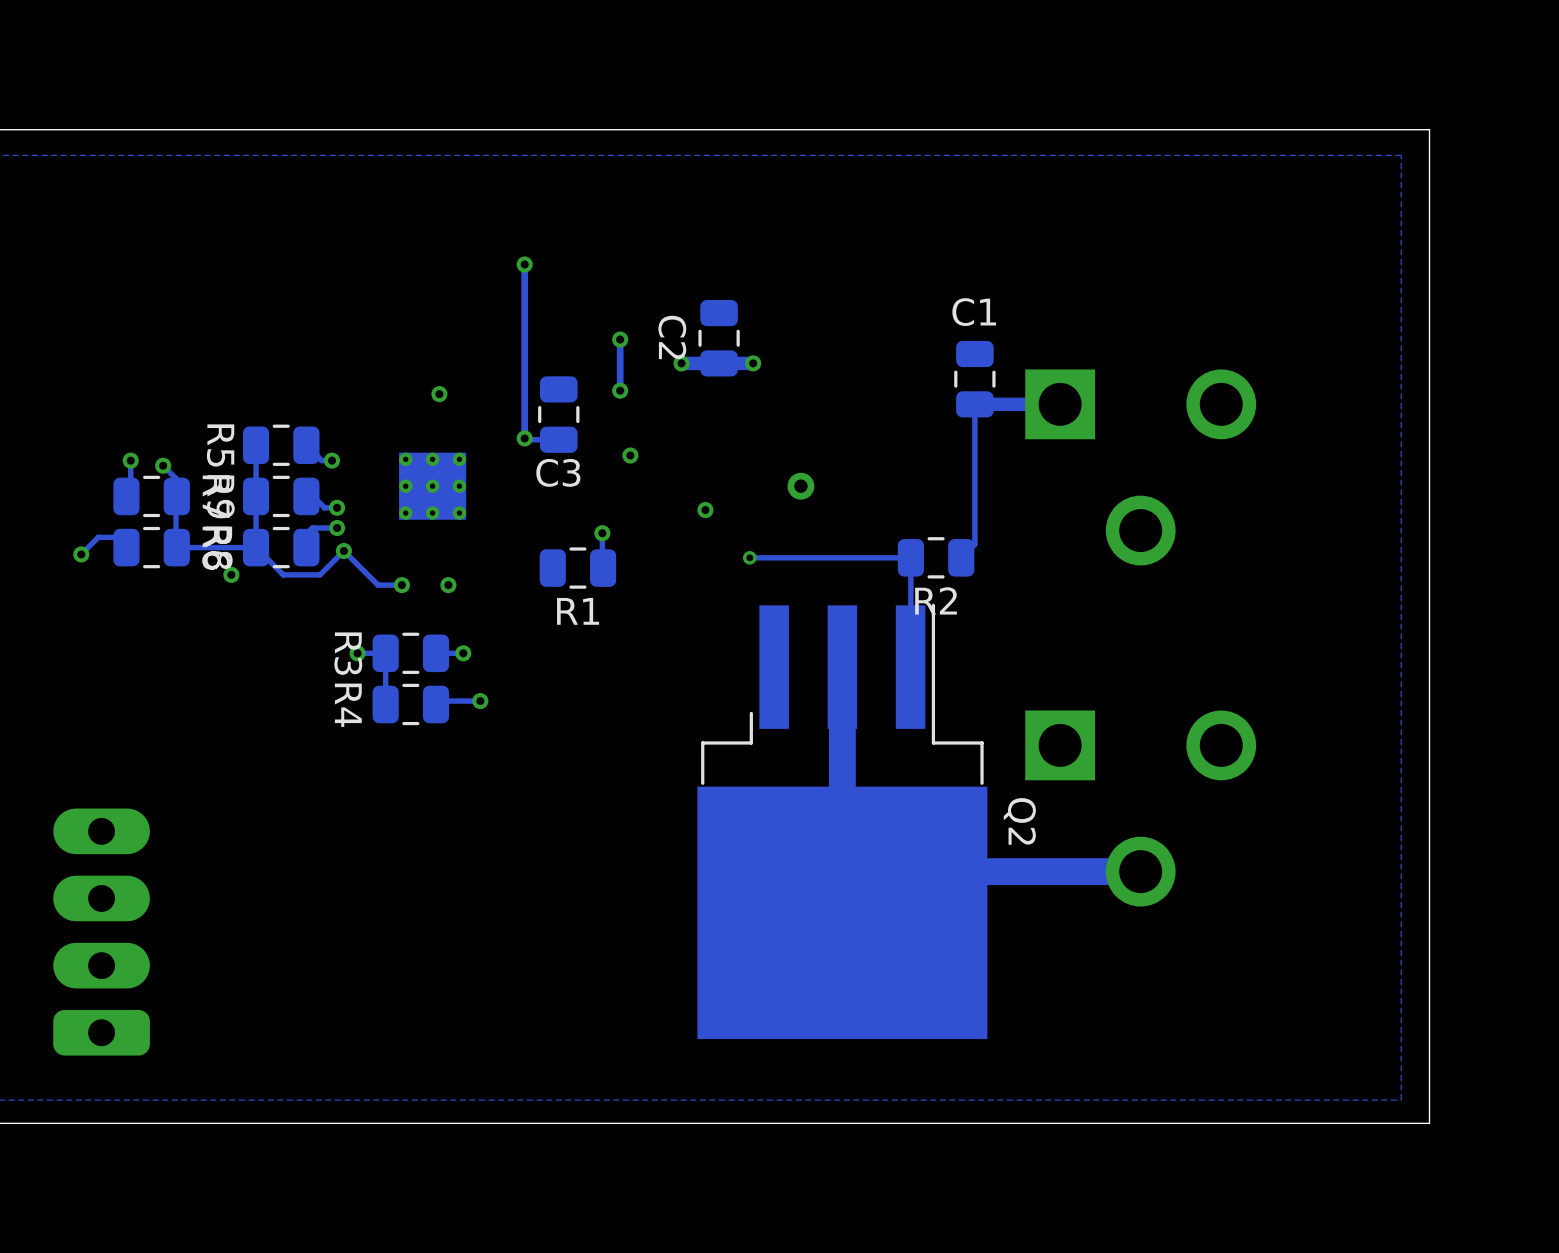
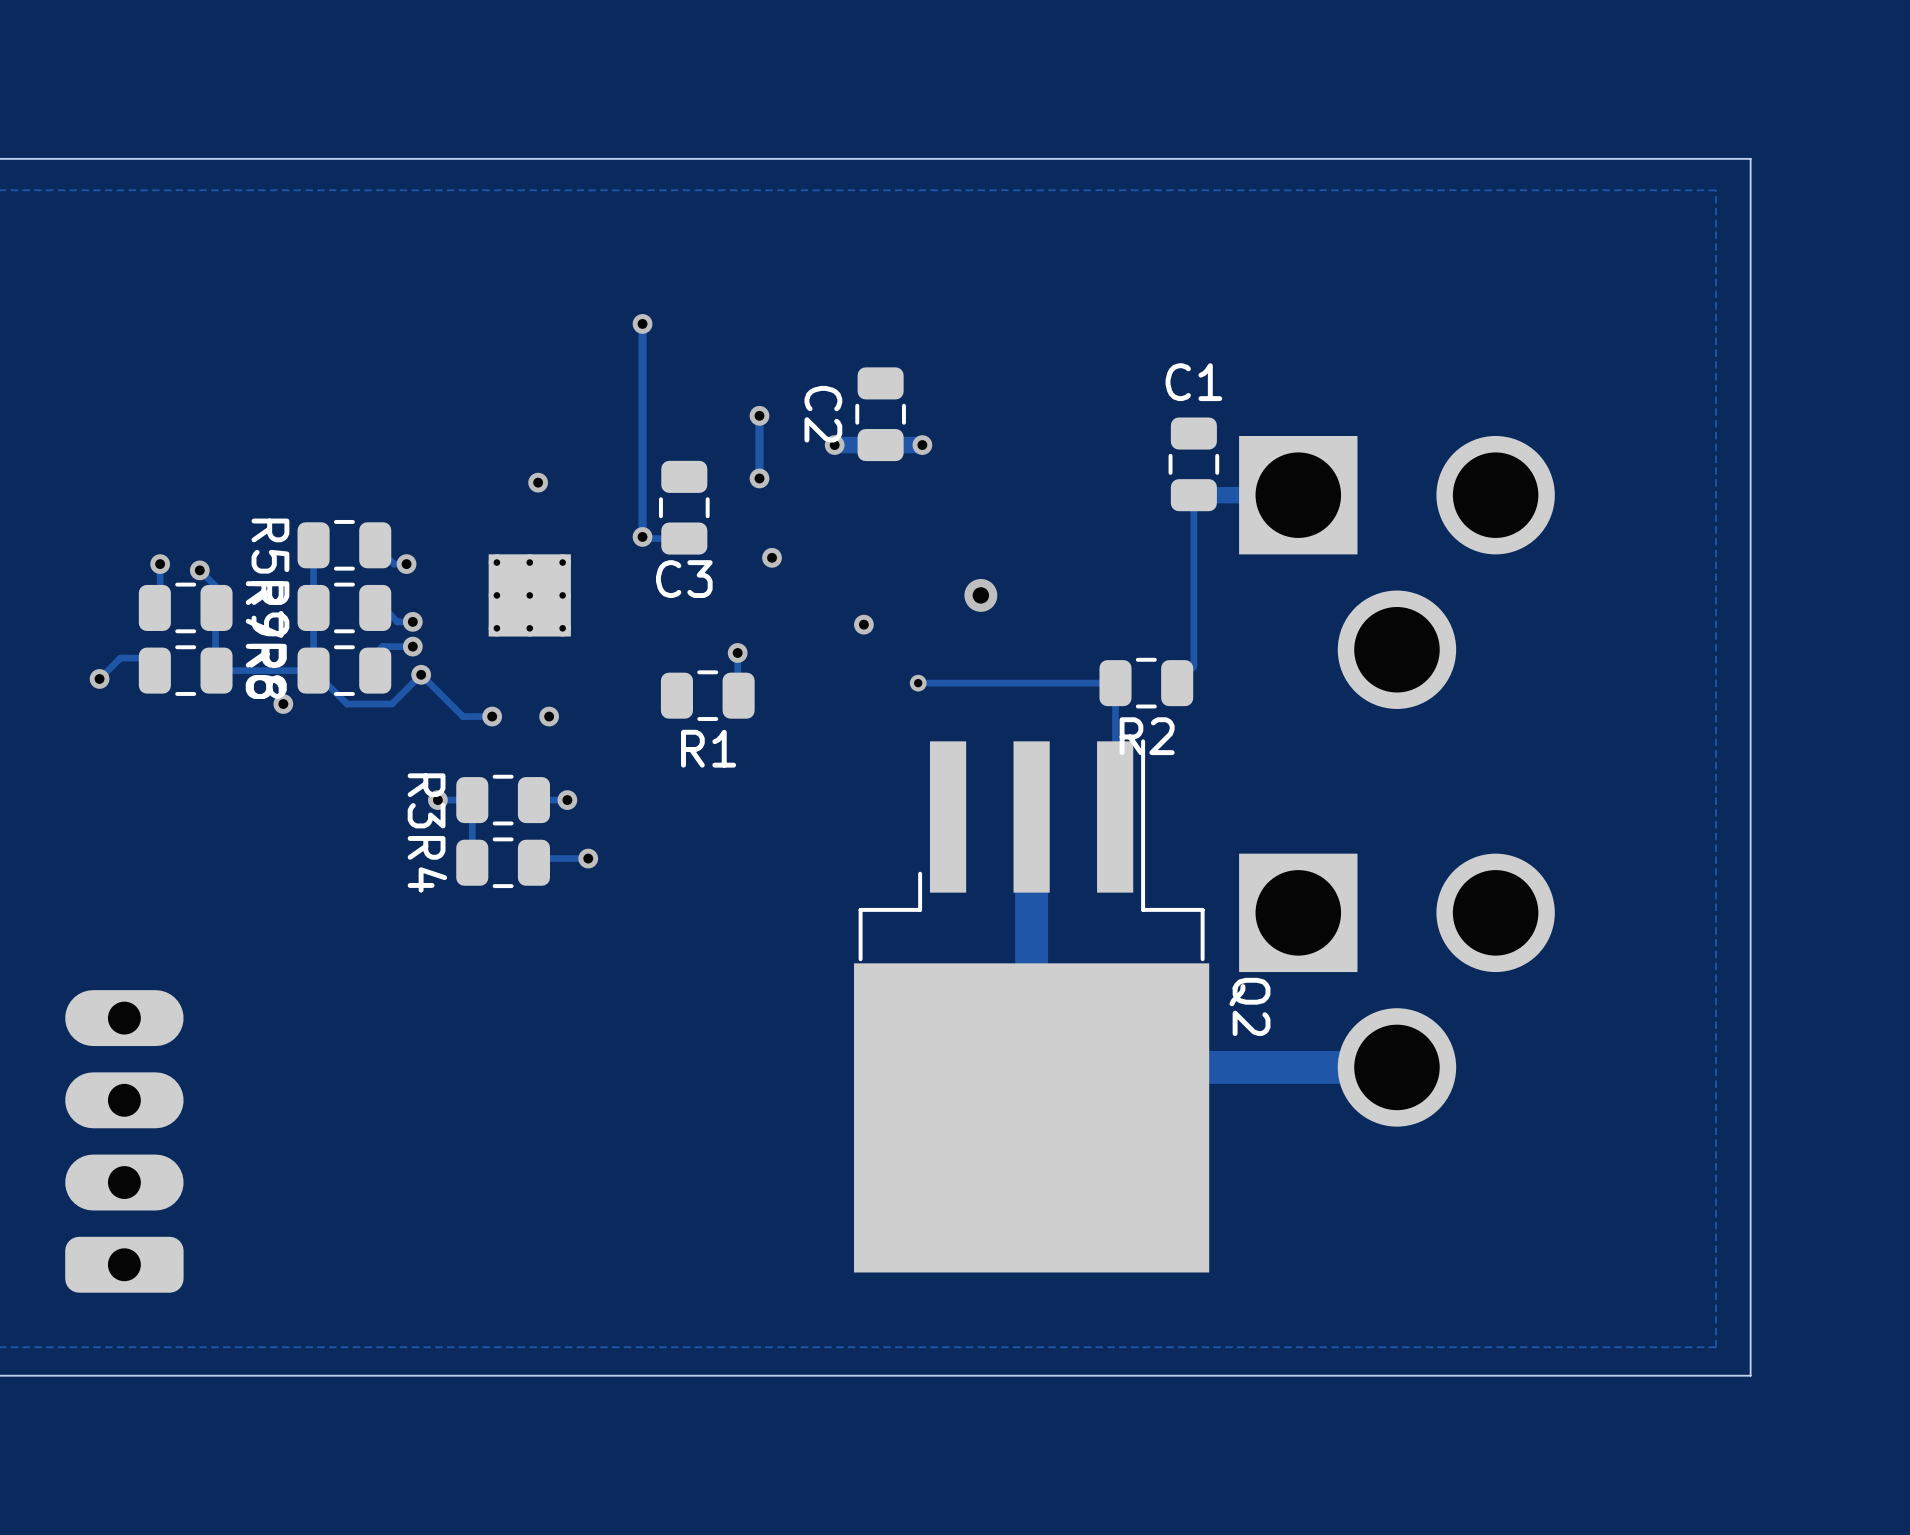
part footprint: [1025, 369, 1257, 566] -> [1239, 435, 1555, 709]
part footprint: [1025, 710, 1257, 907] -> [1239, 853, 1555, 1127]

